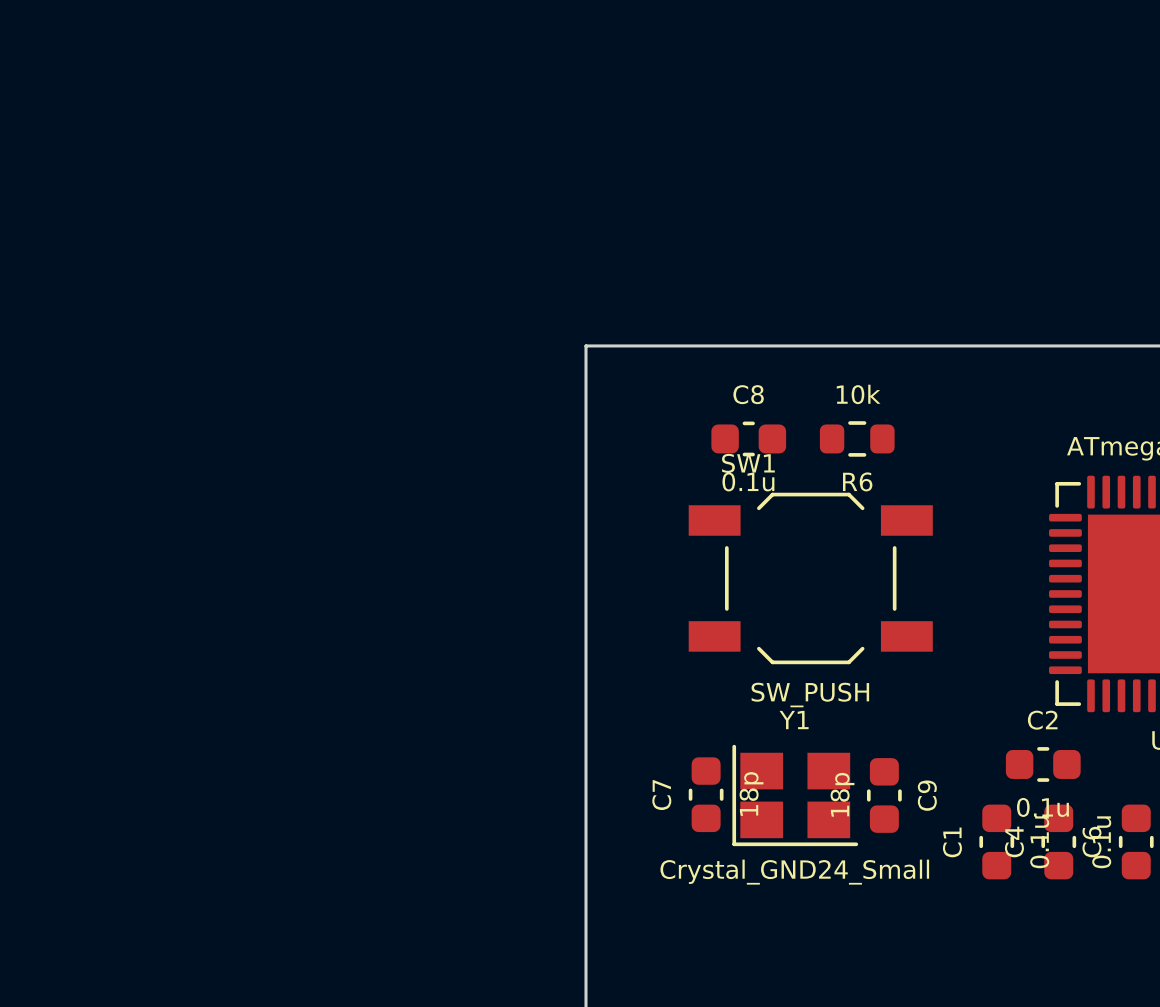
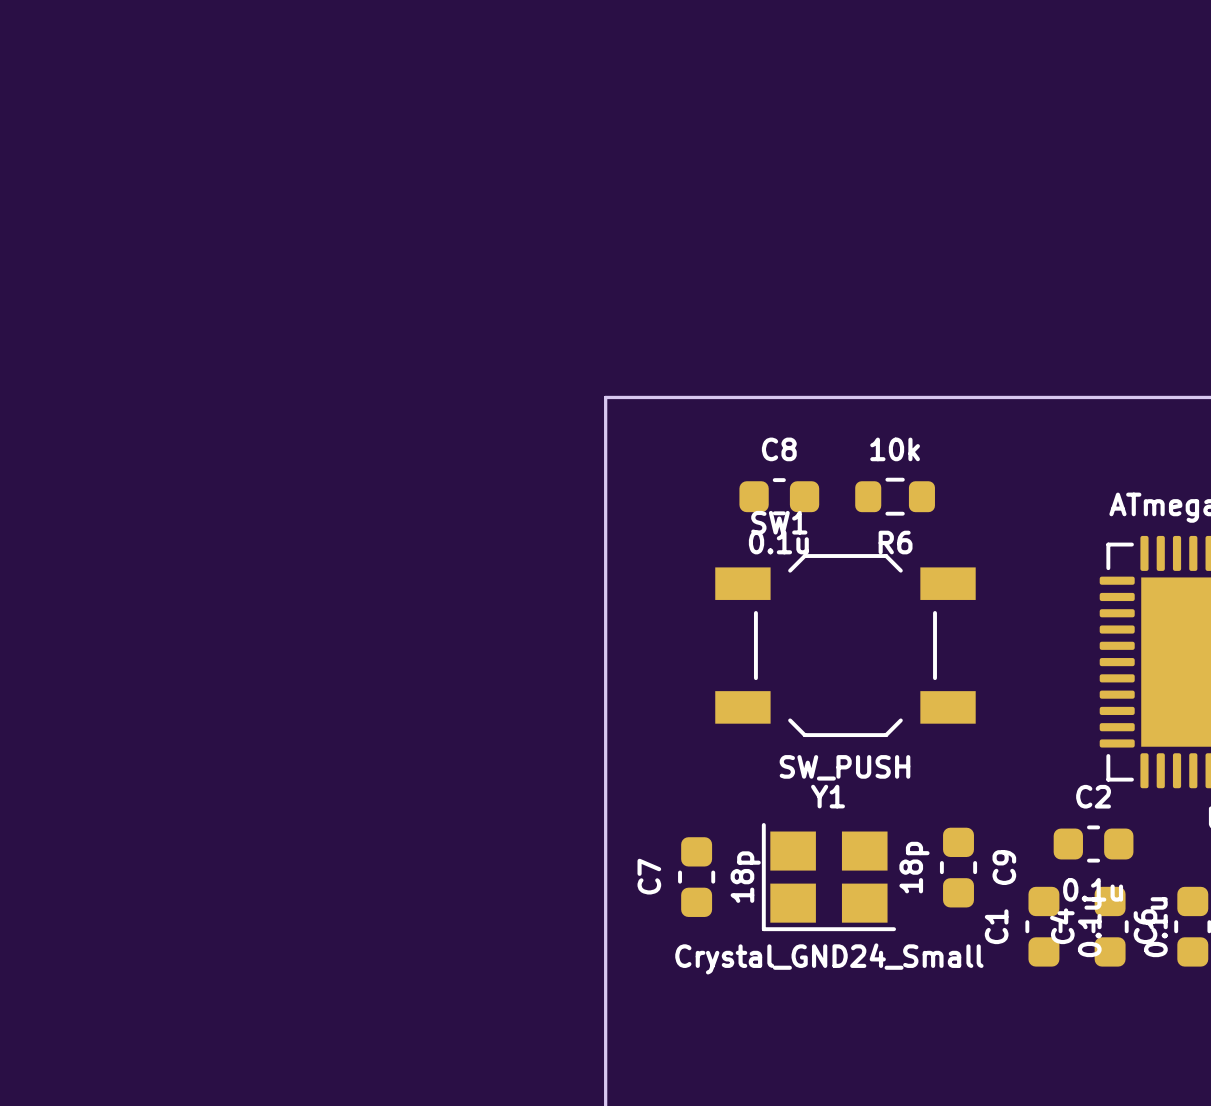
C7 position: (706, 794) -> (696, 877)
C9 position: (884, 795) -> (958, 867)

